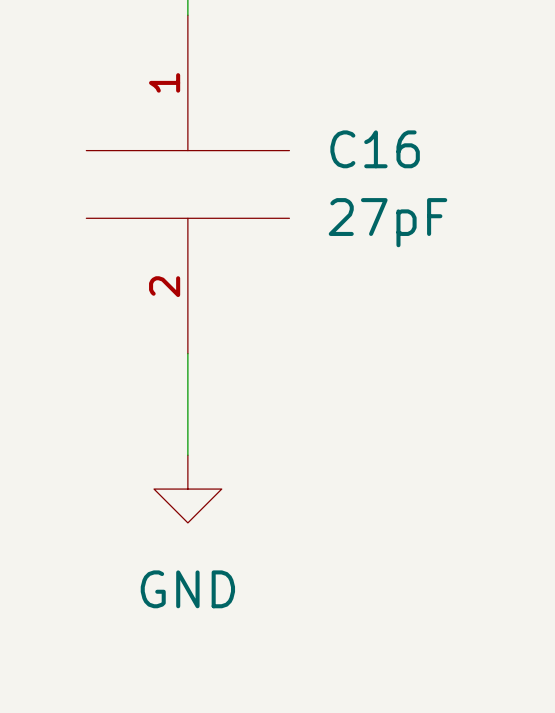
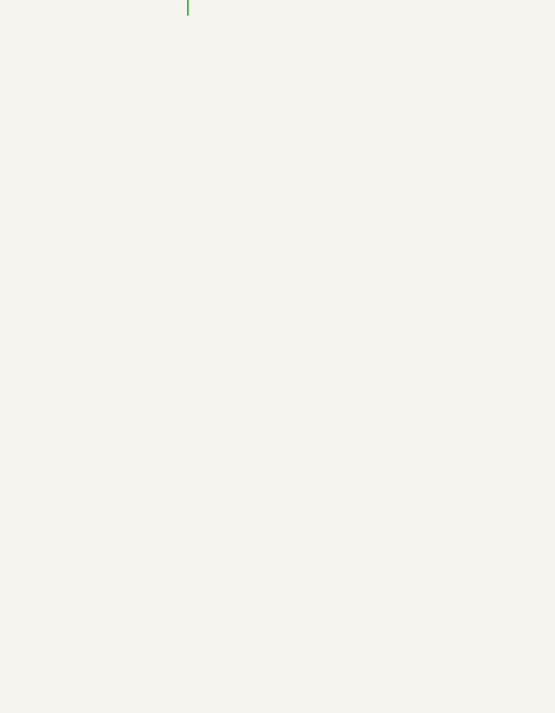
C16: 27pF (187, 184) -> none
wire: (187, 353) (187, 455) -> none
power symbol: GND (187, 489) -> none

